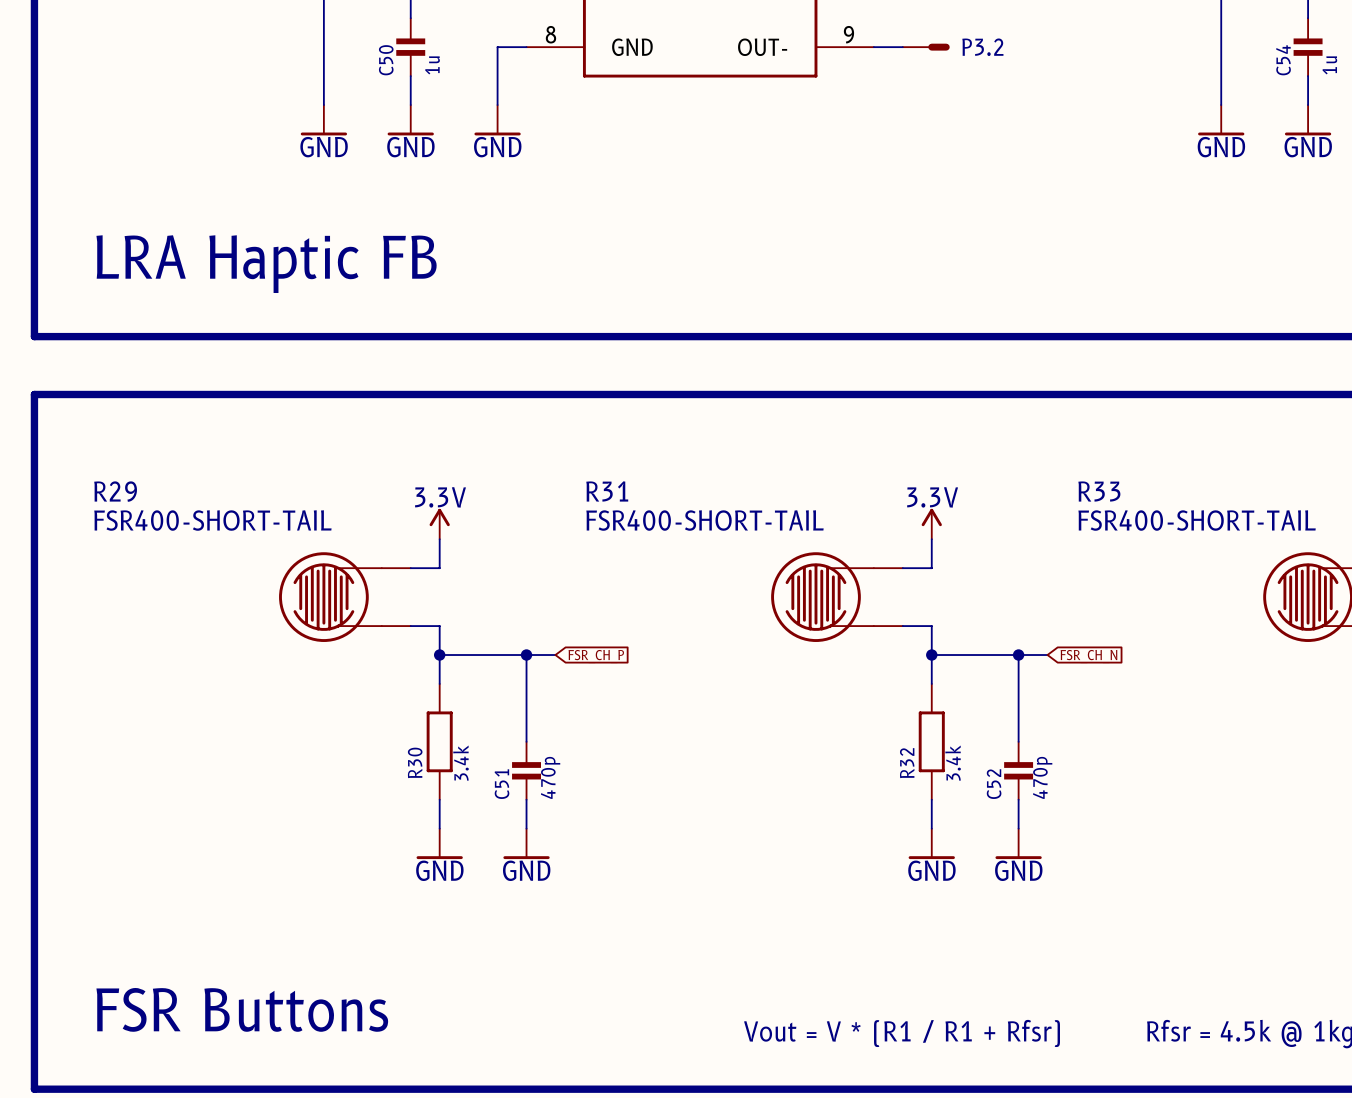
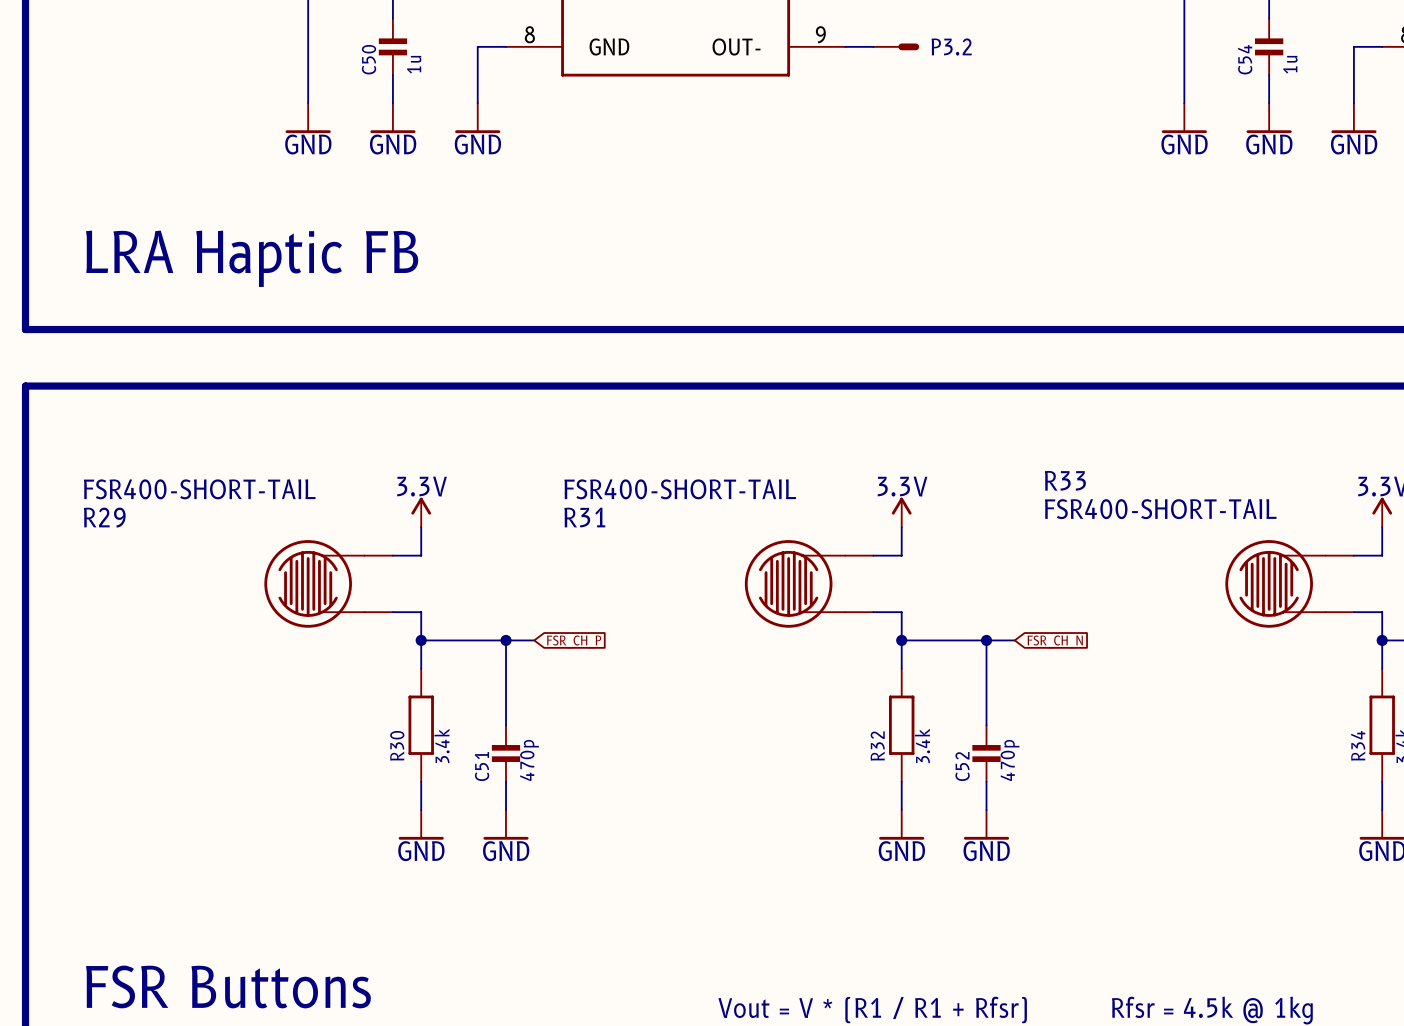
R29 name position: R29 (115, 491) -> R29 (104, 517)
R31 name position: R31 (607, 491) -> R31 (584, 517)
R29 flip: as is (330, 597) -> up-down (314, 583)
R31 flip: as is (822, 597) -> up-down (795, 583)

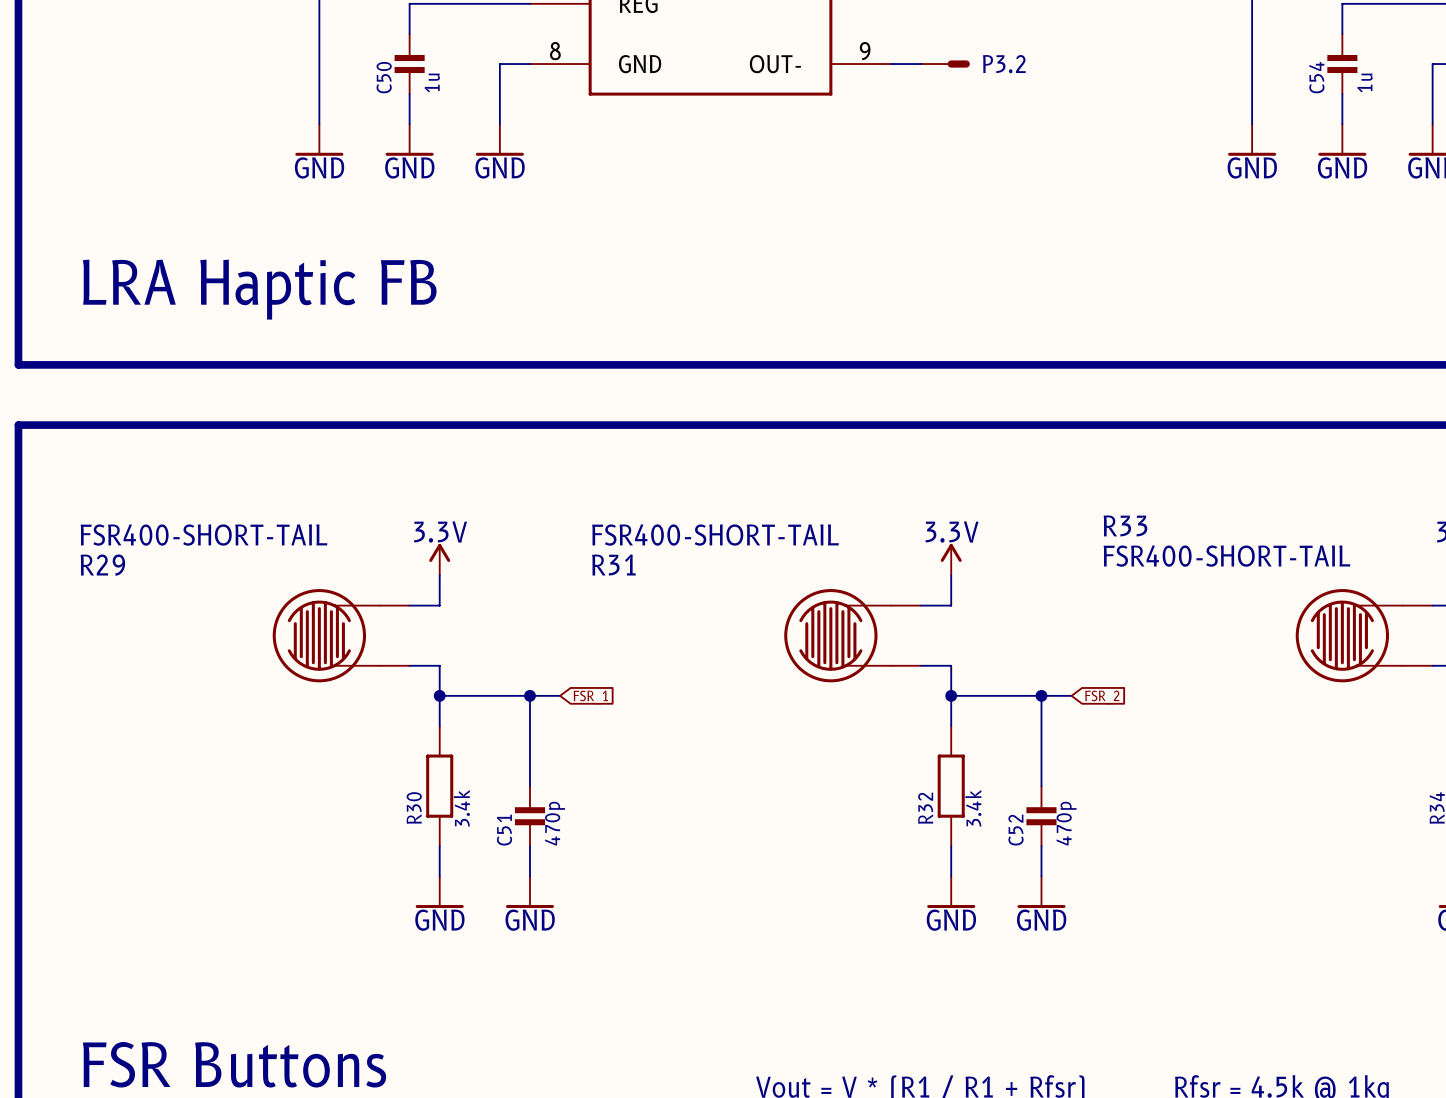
global label: FSR_CH_P (574, 641) -> FSR_1 (590, 697)
global label: FSR_CH_N (1055, 641) -> FSR_2 (1102, 697)

